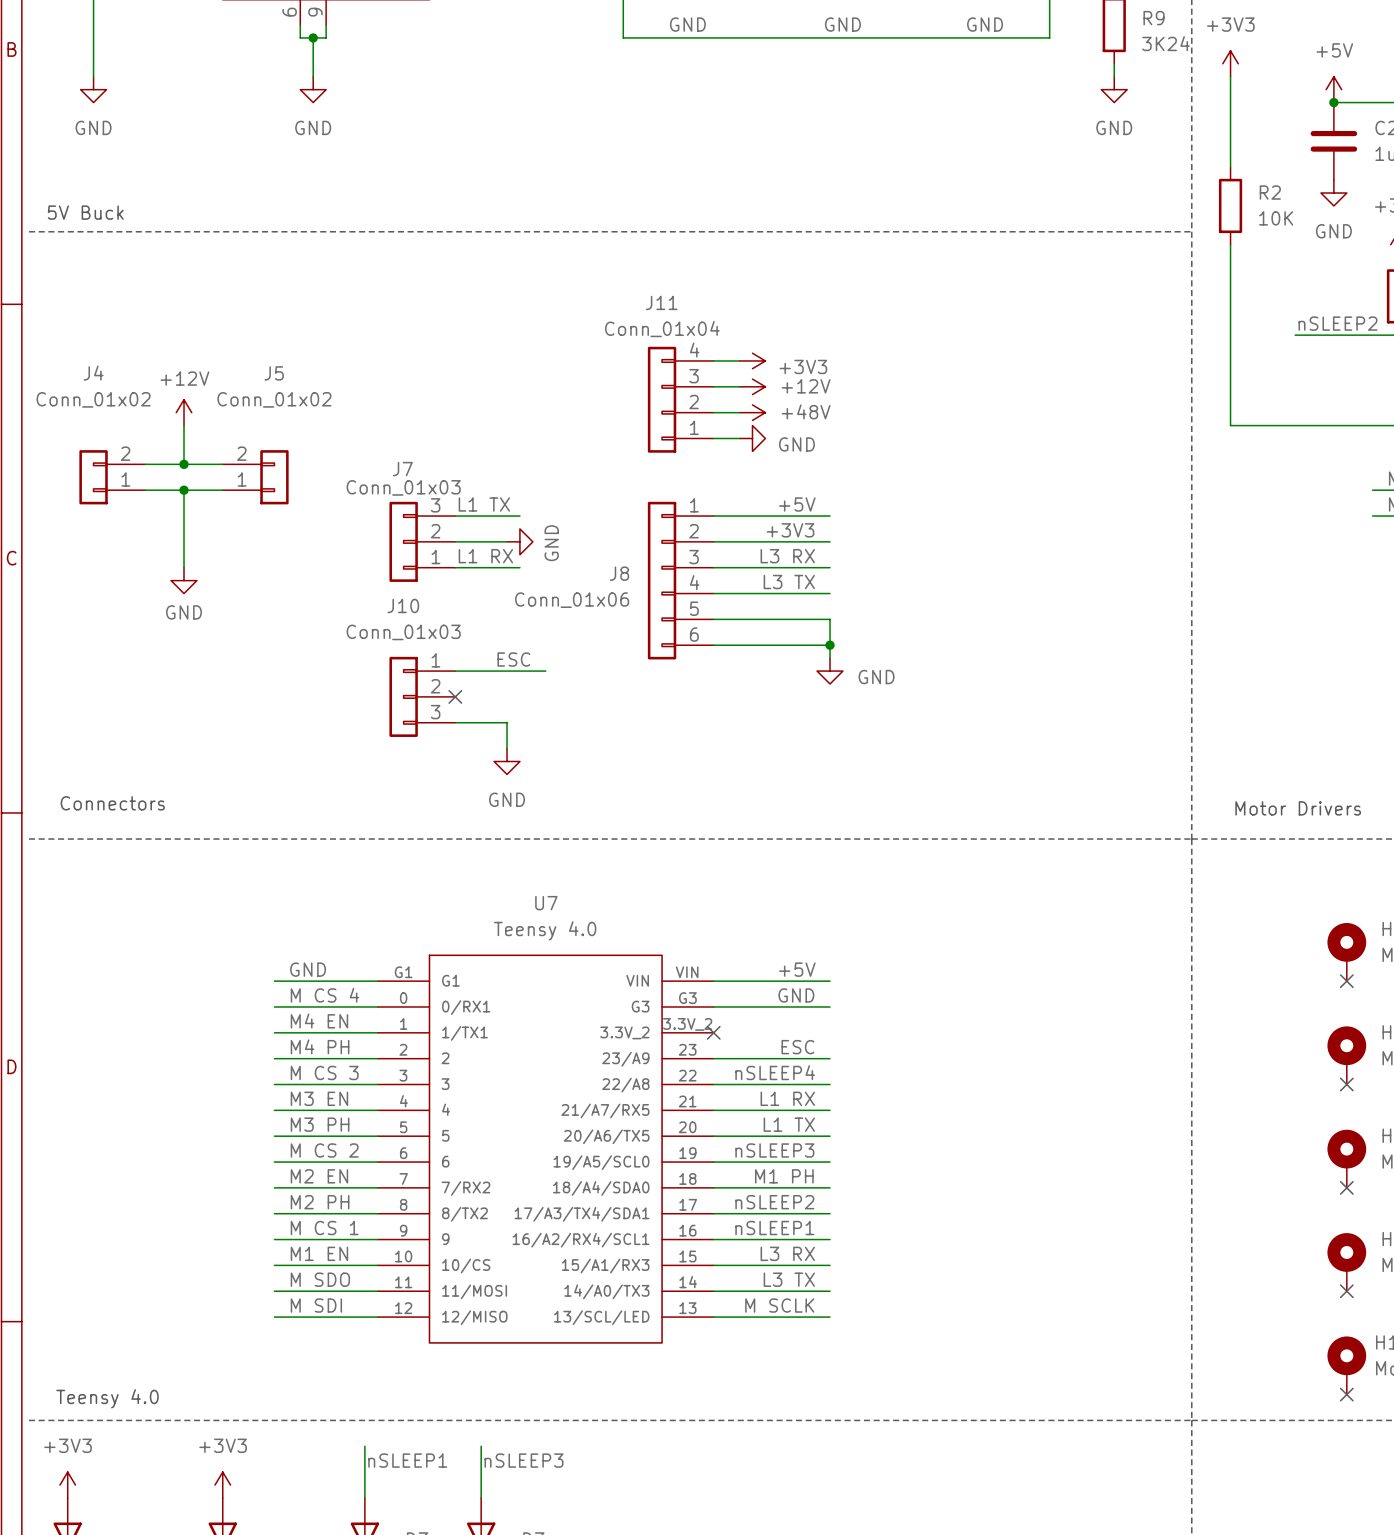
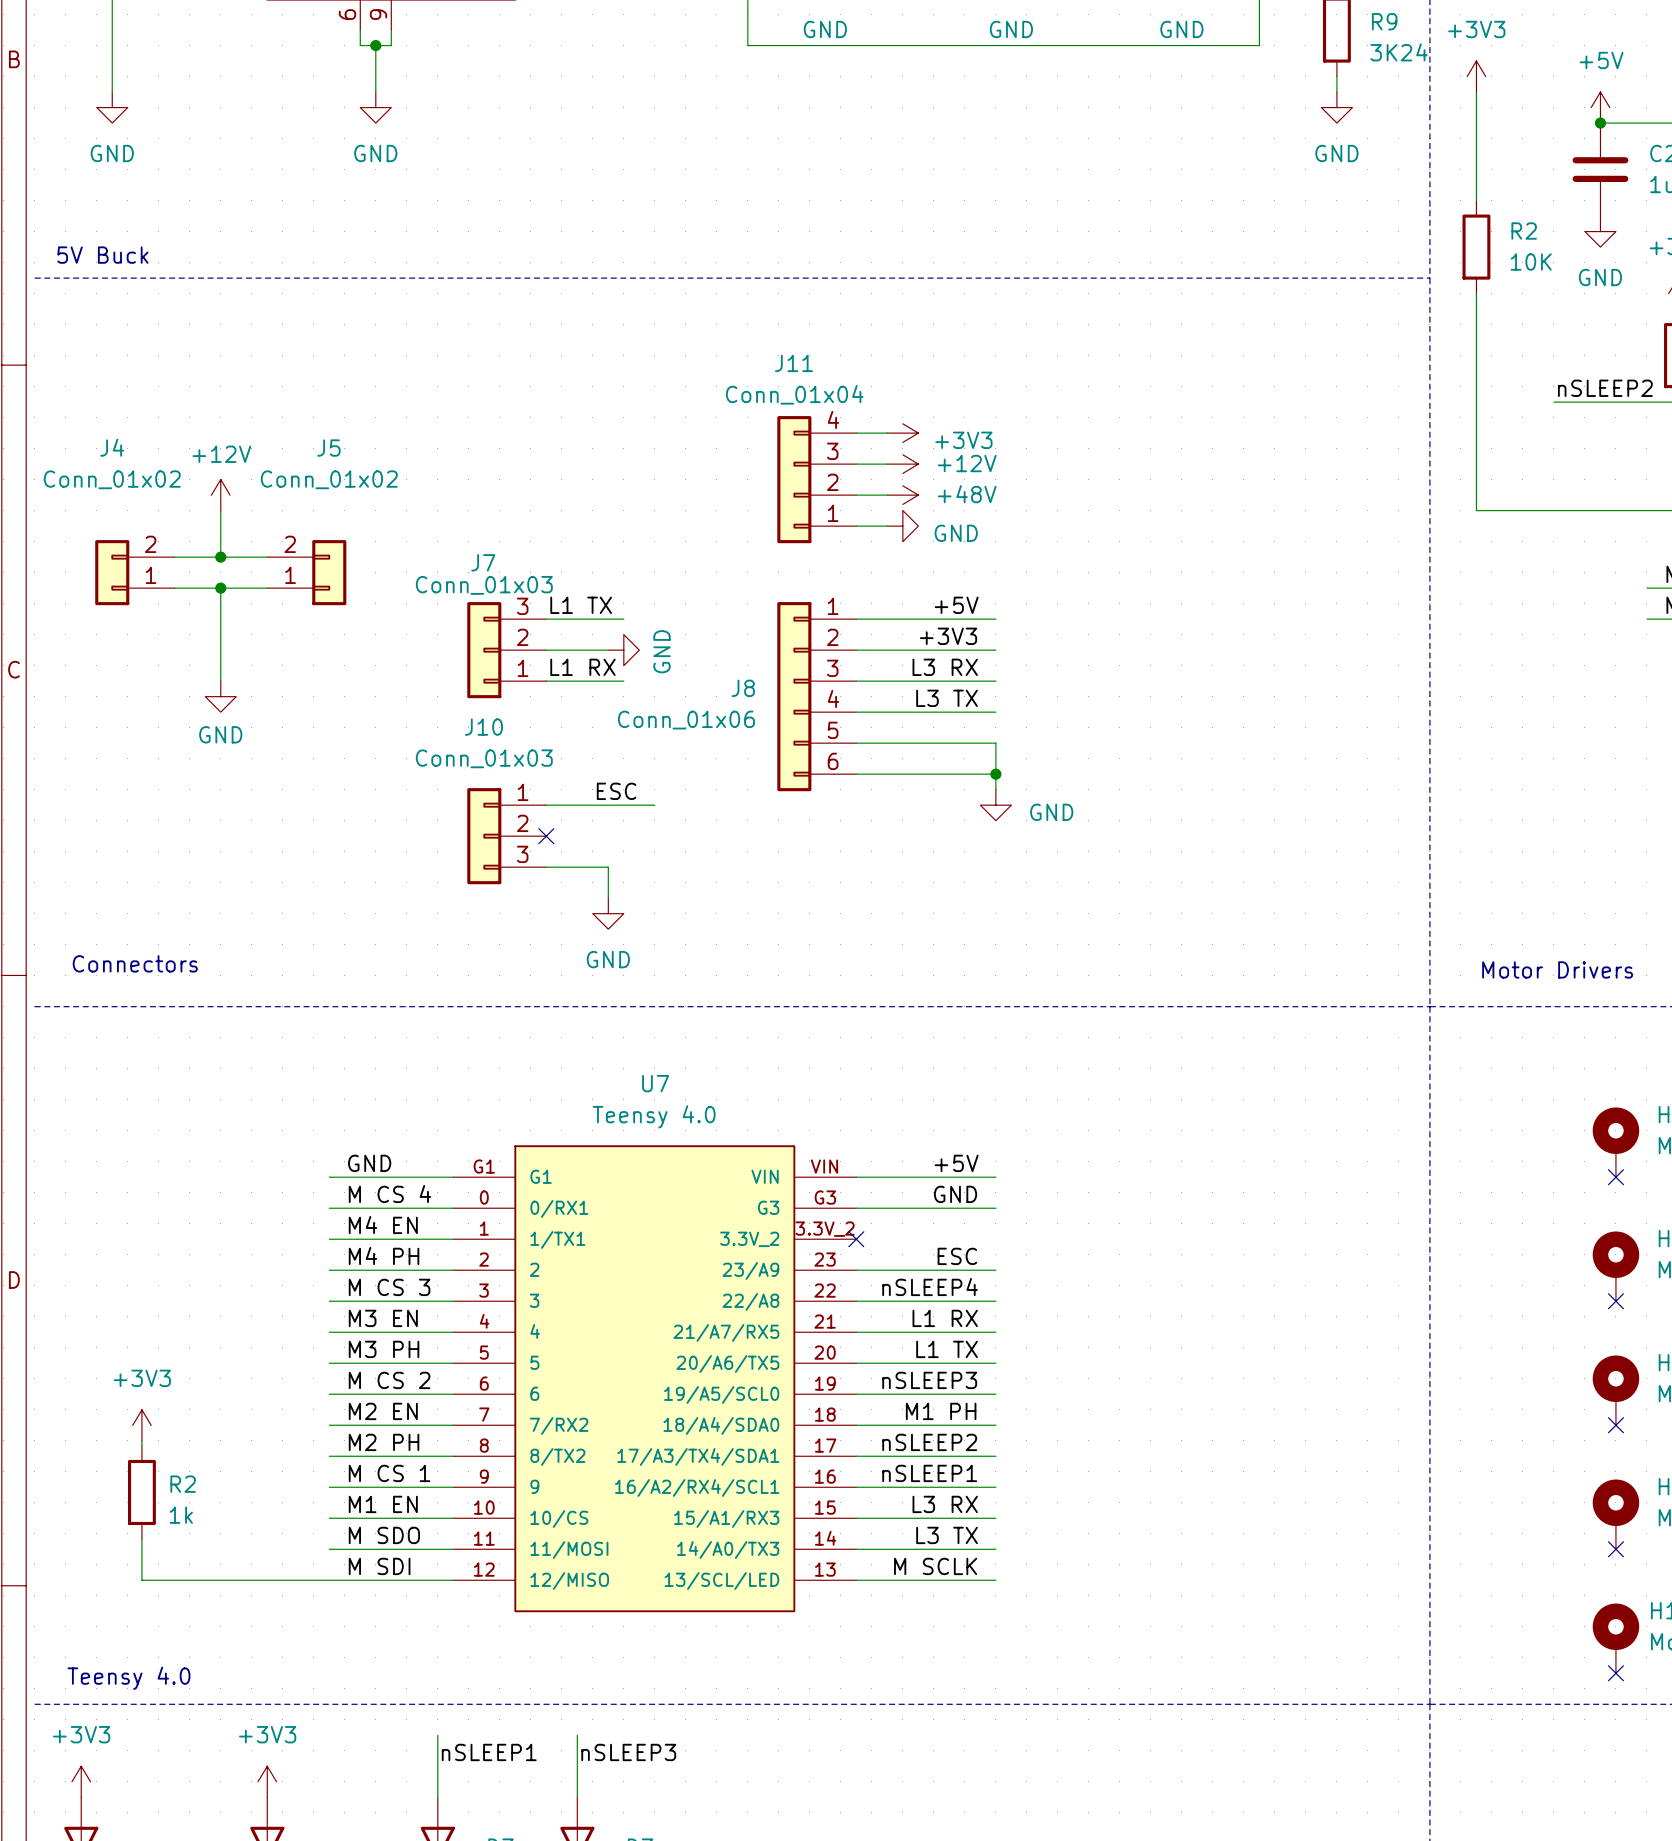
power symbol: none -> +3V3 (141, 1425)
wire: none -> (141, 1440) (141, 1445)
R2: none -> 1k (141, 1492)
wire: none -> (141, 1538) (141, 1580) (329, 1580)

